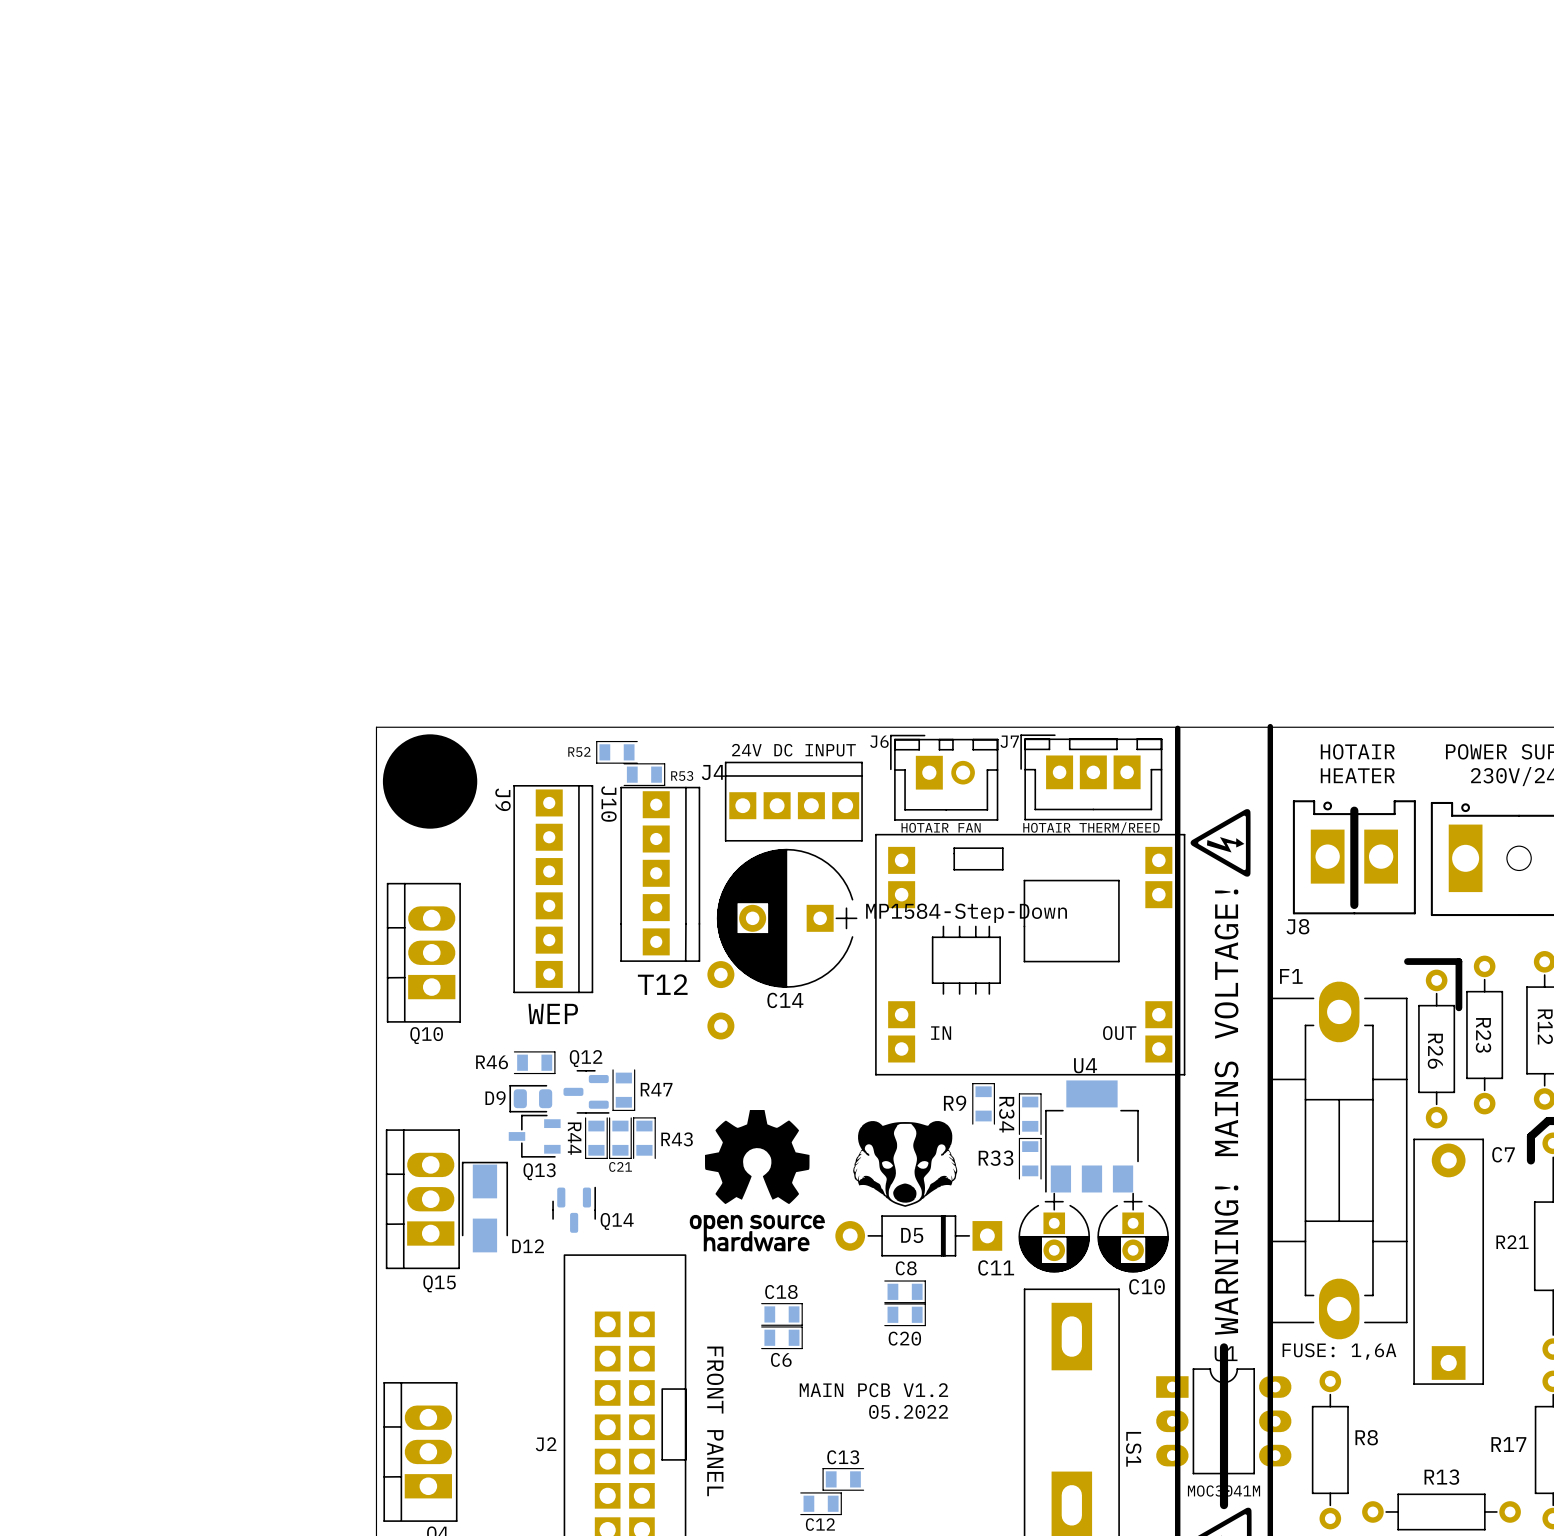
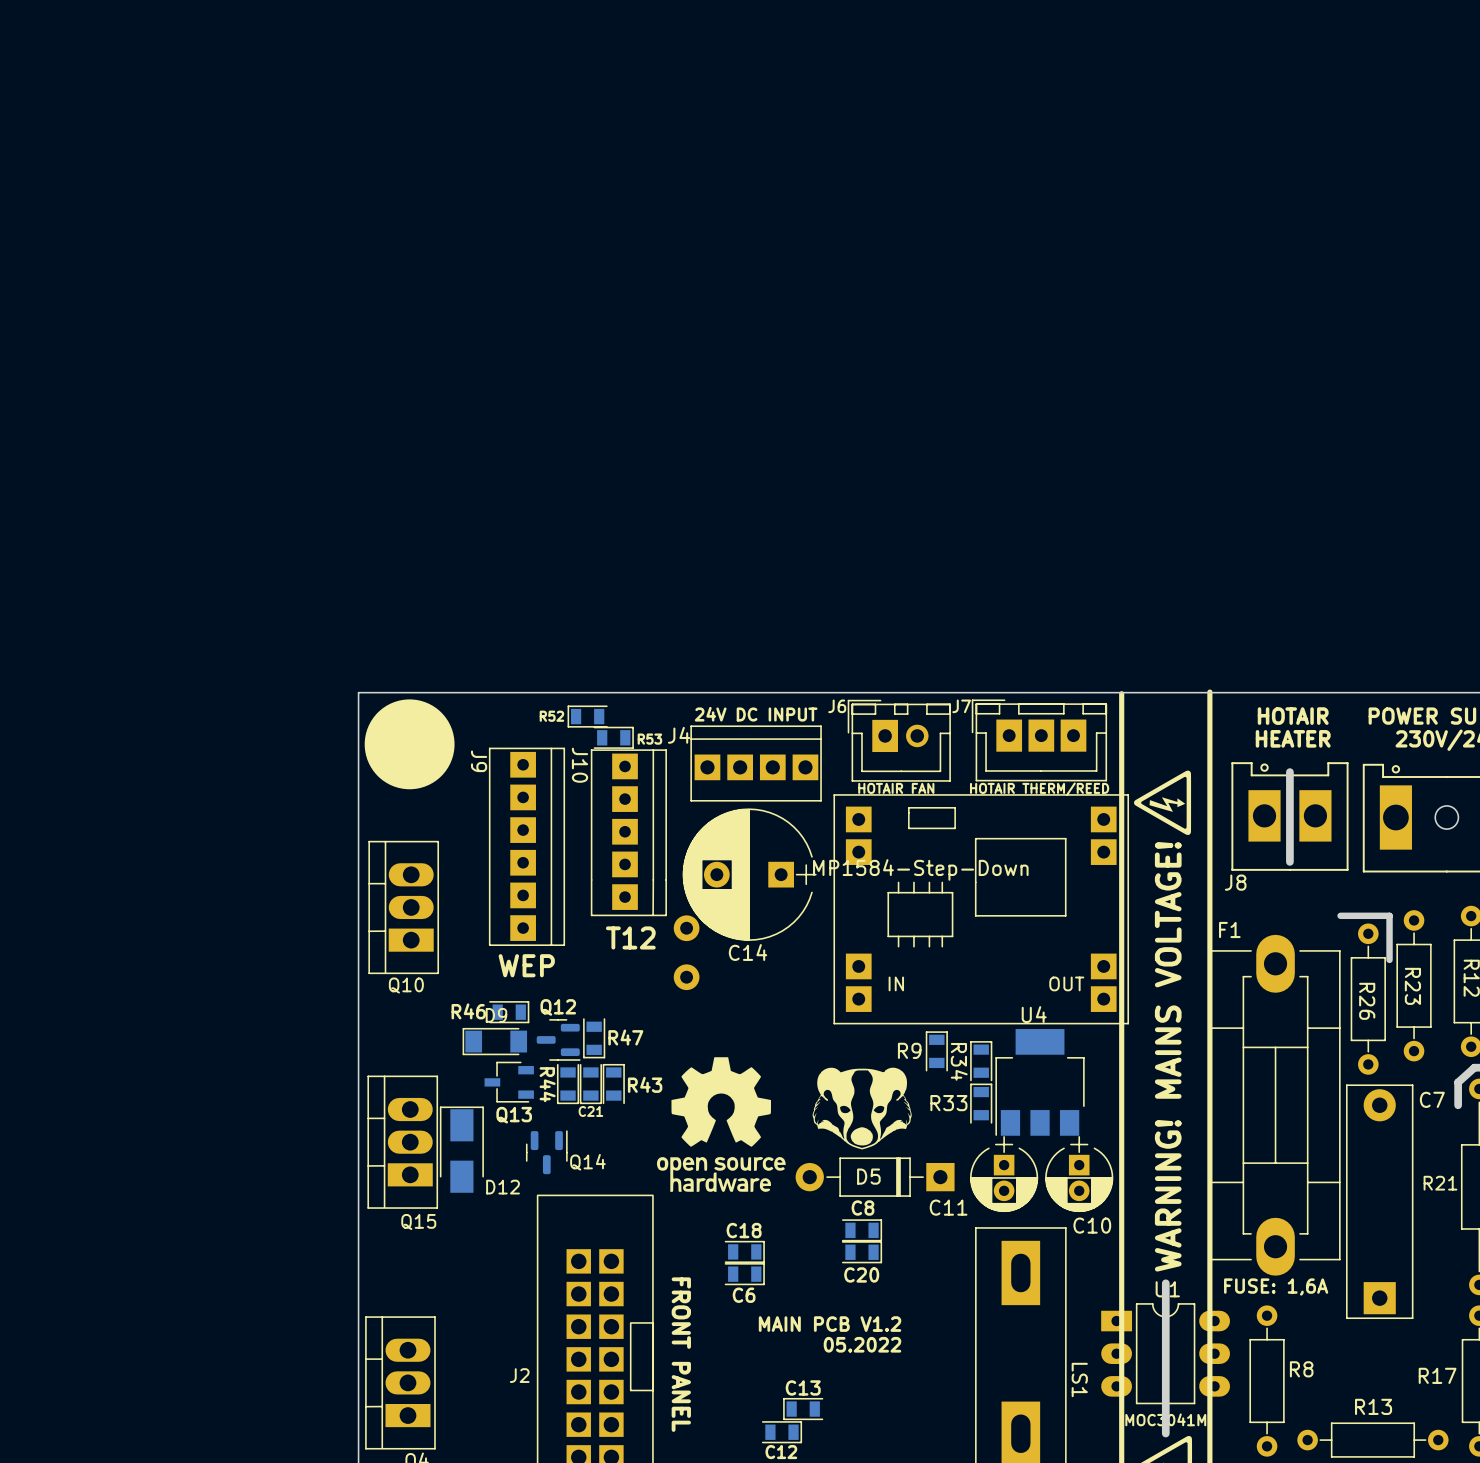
D9 footprint: [509, 1084, 553, 1113] -> [462, 1027, 528, 1056]
D9 name position: D9 (495, 1098) -> D9 (496, 1015)

